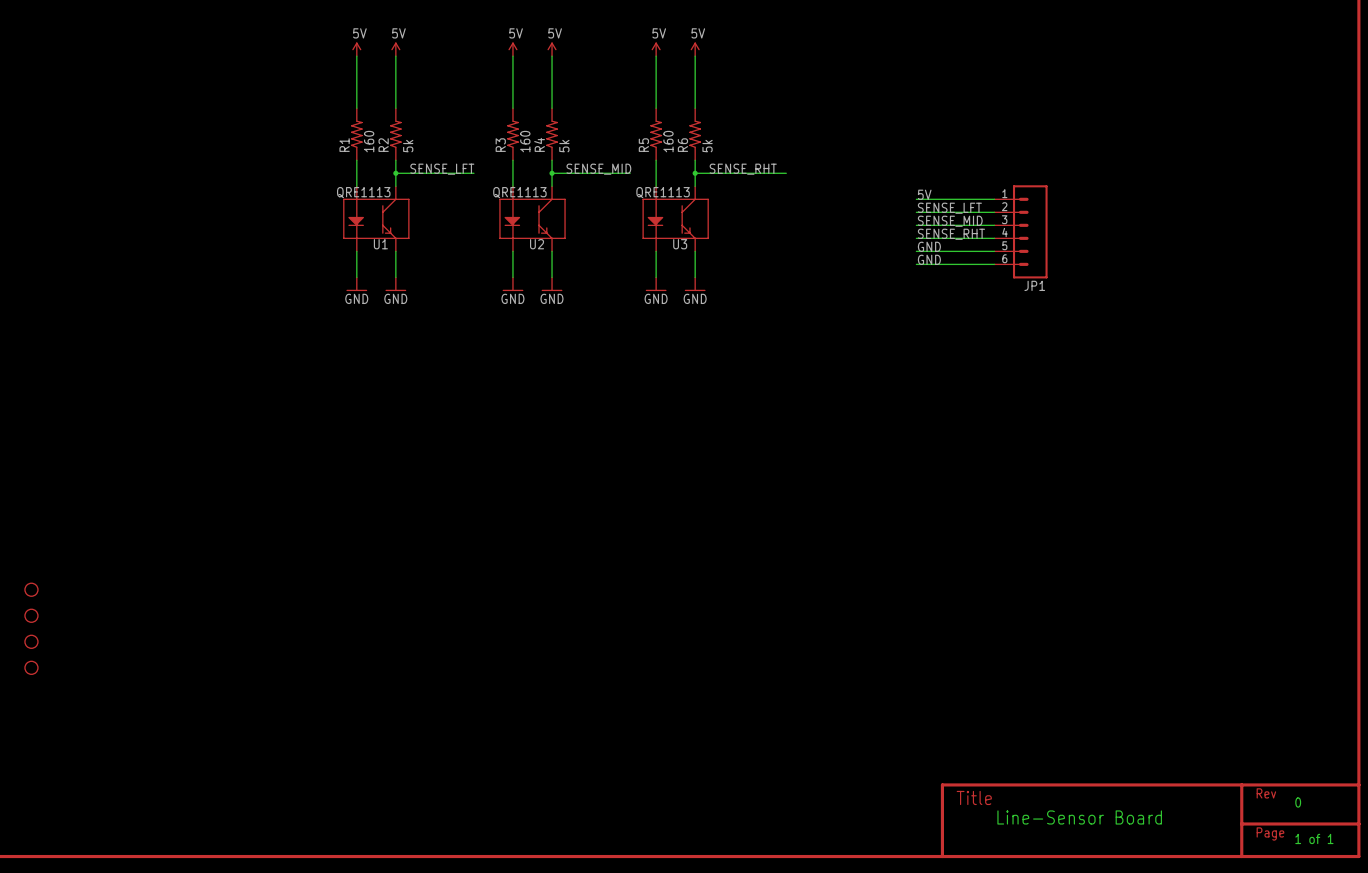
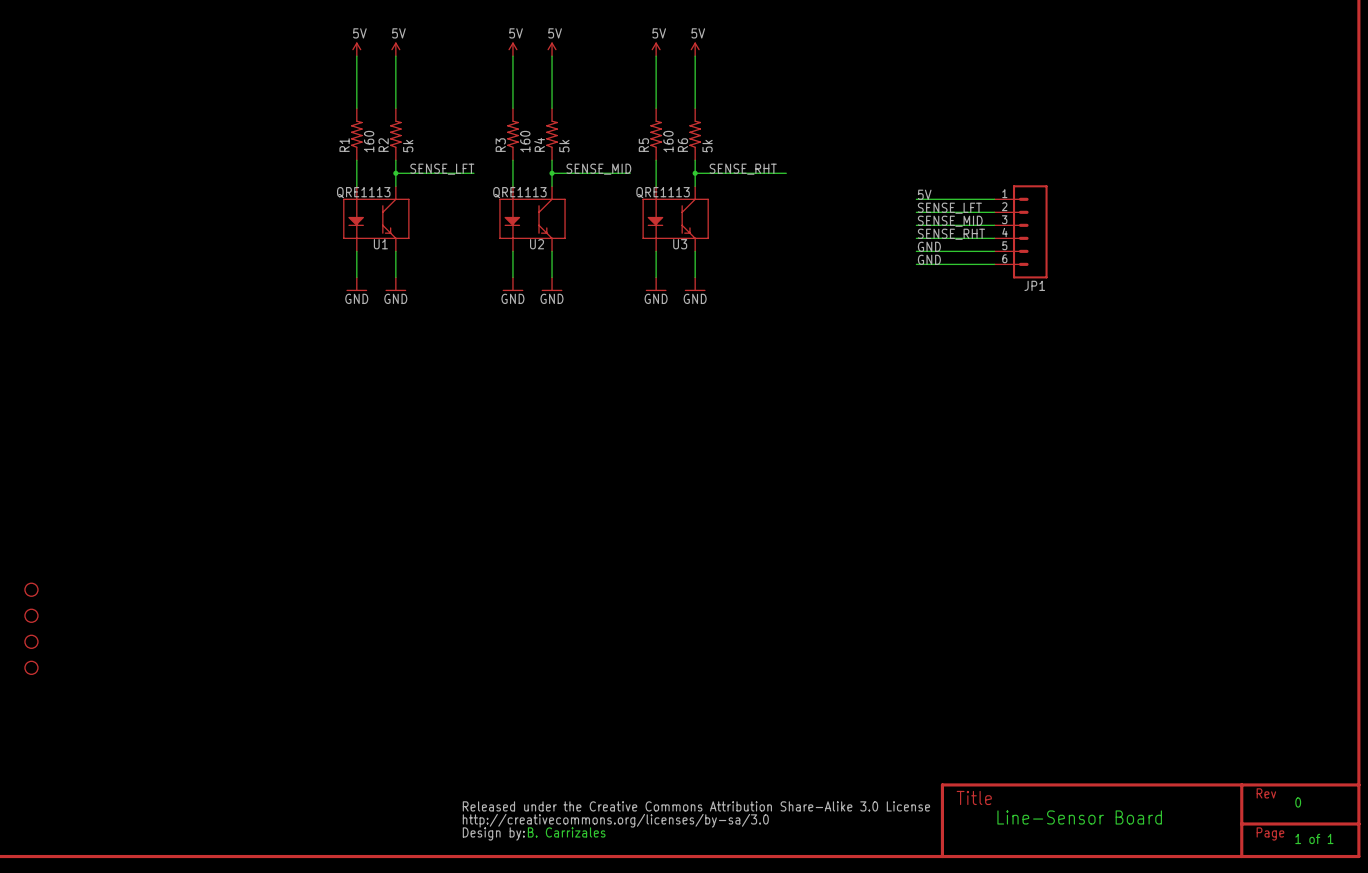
part: none -> (696, 820)
text: none -> B. Carrizales (566, 832)

